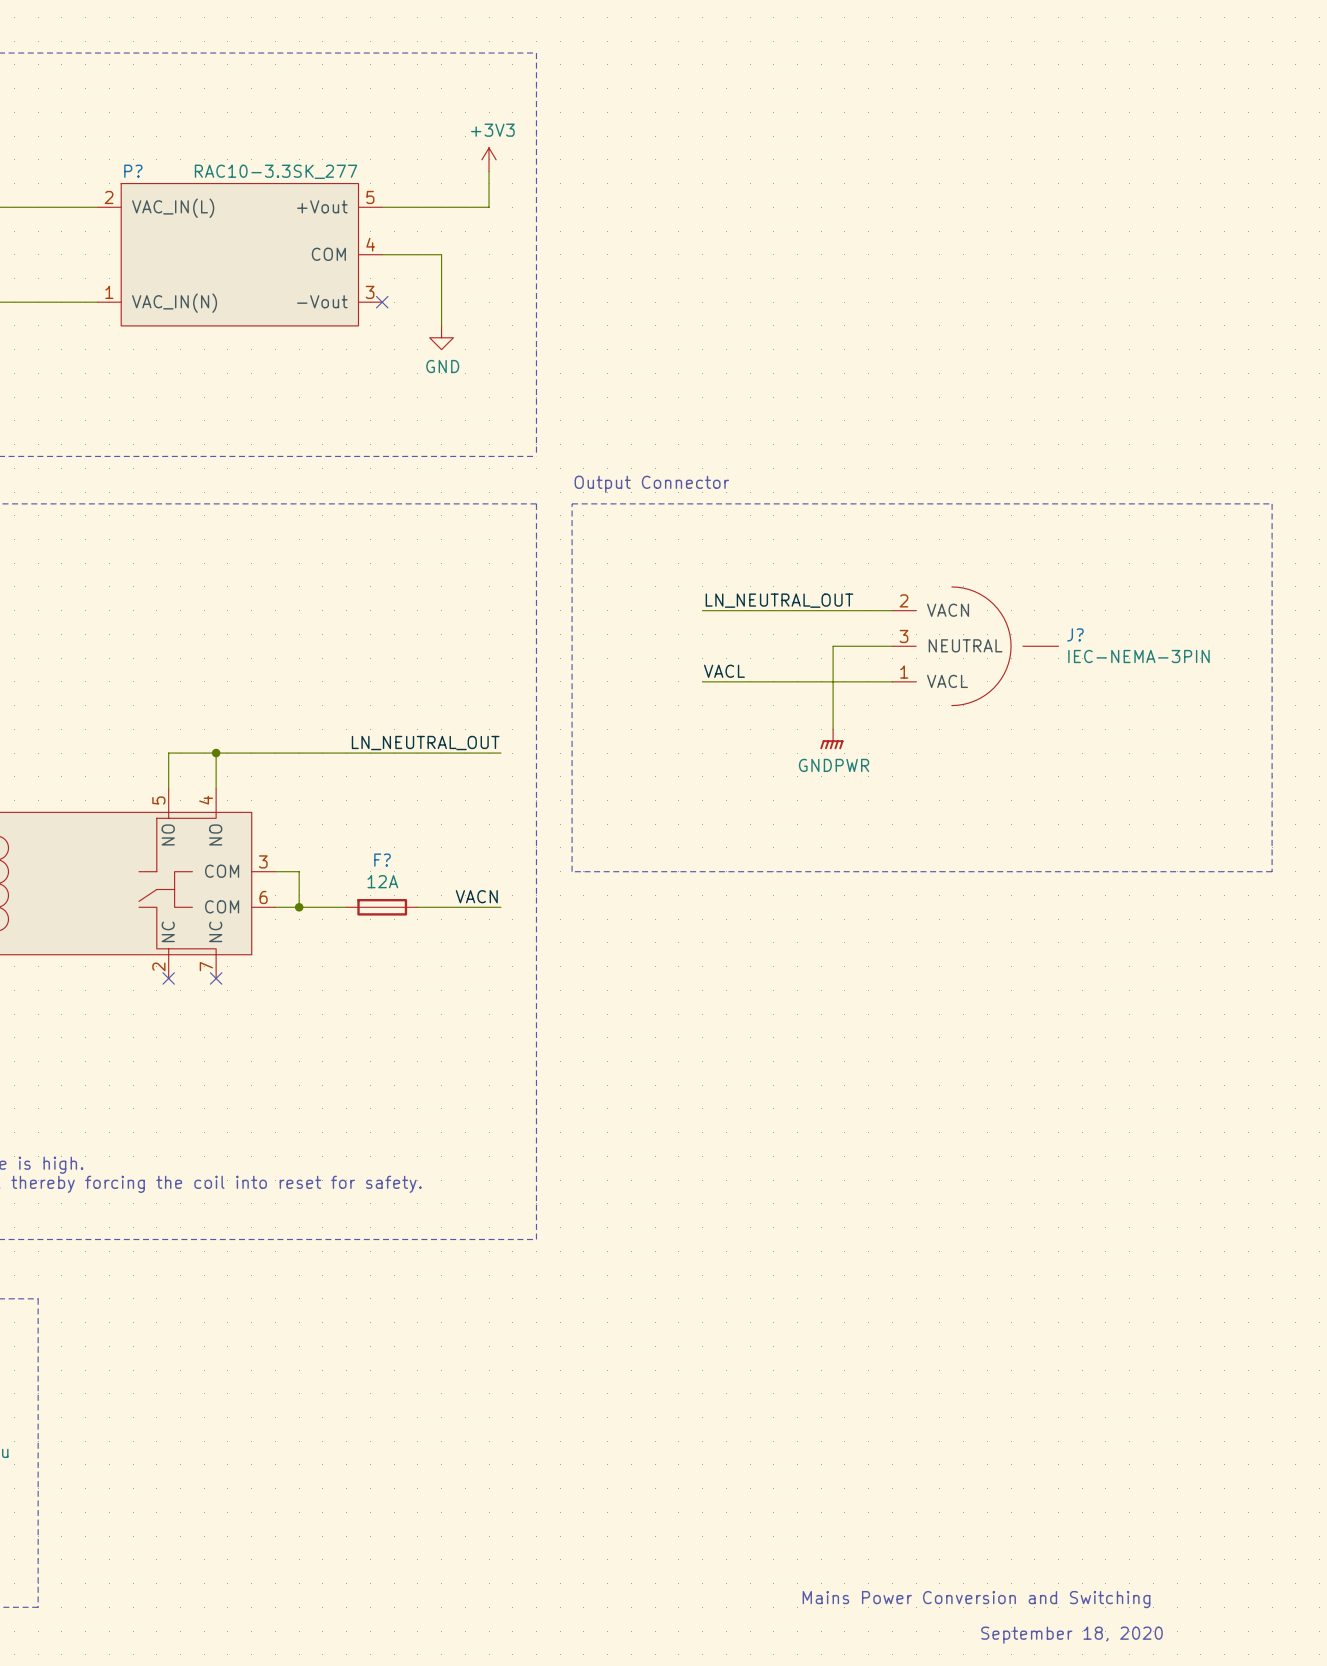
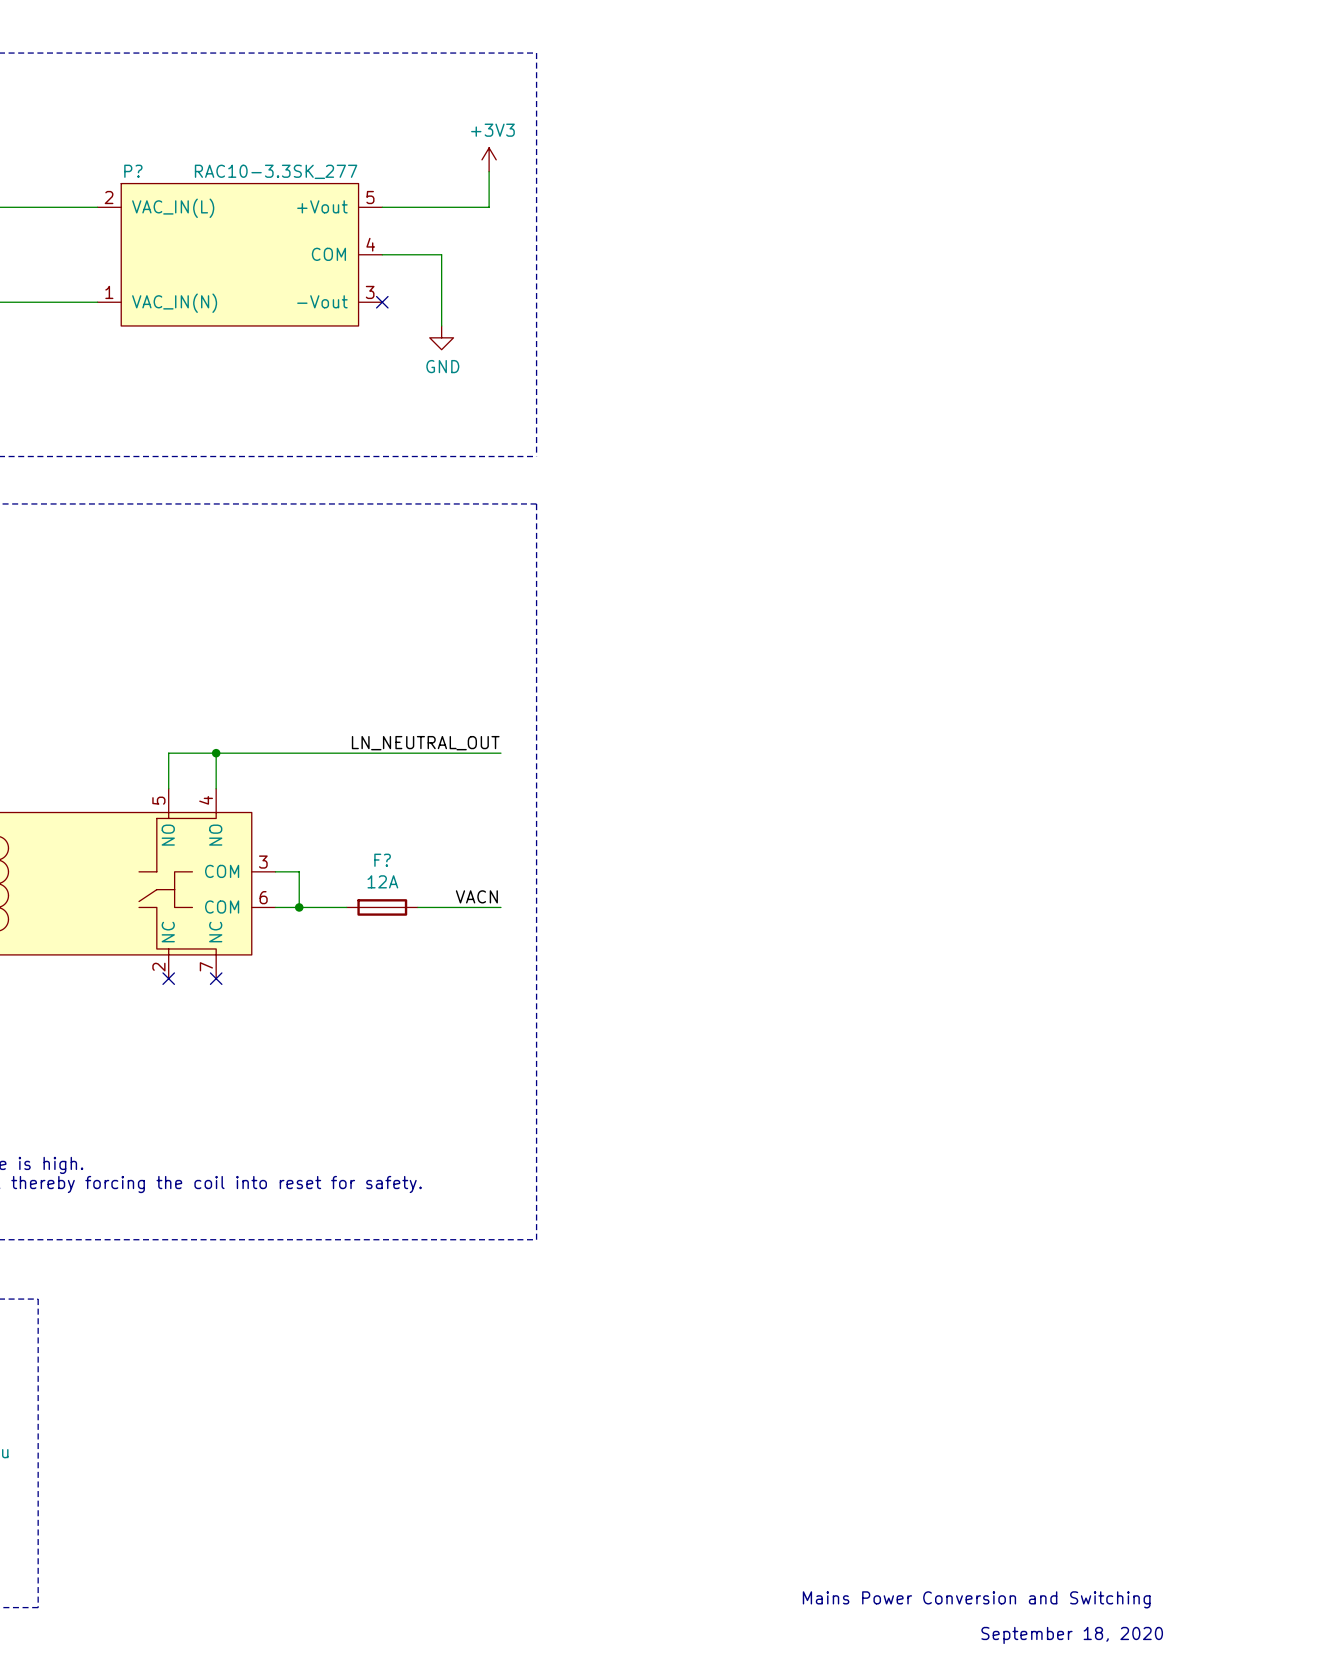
text: Output Connector (651, 484) -> none
line: (572, 503) (1272, 503) (1272, 871) (572, 871) (572, 503) -> none
label: LN_NEUTRAL_OUT (779, 600) -> none
wire: (702, 610) (892, 610) -> none
wire: (892, 646) (833, 646) (833, 729) -> none
J?: IEC-NEMA-3PIN (975, 646) -> none
label: VACL (724, 671) -> none
wire: (702, 681) (892, 681) -> none
power symbol: GNDPWR (831, 739) -> none

